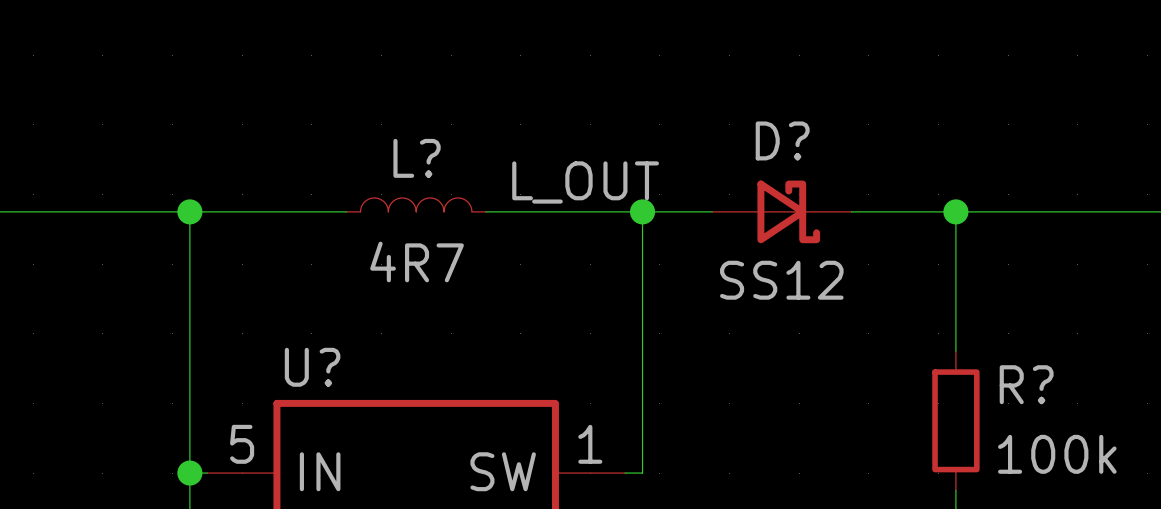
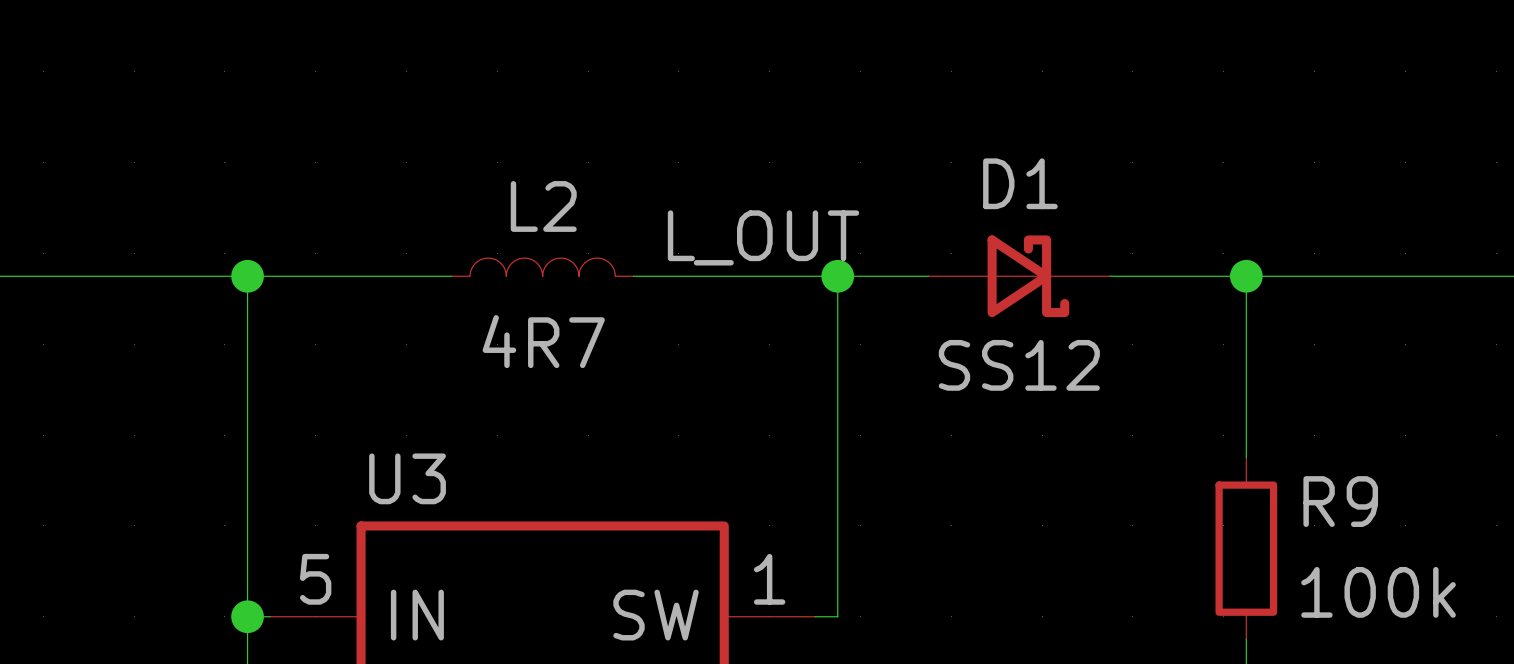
D? name: D? (782, 140) -> D1 (1020, 183)
L? name: L? (417, 158) -> L2 (543, 206)
U? name: U? (312, 367) -> U3 (407, 478)
R? name: R? (1026, 384) -> R9 (1340, 501)

